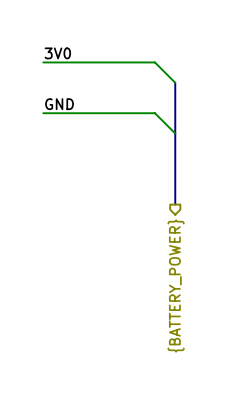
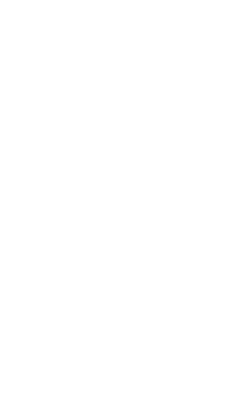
label: 3V0 (57, 53) -> none
wire: (43, 62) (154, 62) (175, 82) -> none
bus: (175, 82) (175, 204) -> none
label: GND (59, 104) -> none
wire: (43, 113) (154, 113) (175, 133) -> none
hierarchical label: {BATTERY_POWER} (176, 285) -> none

